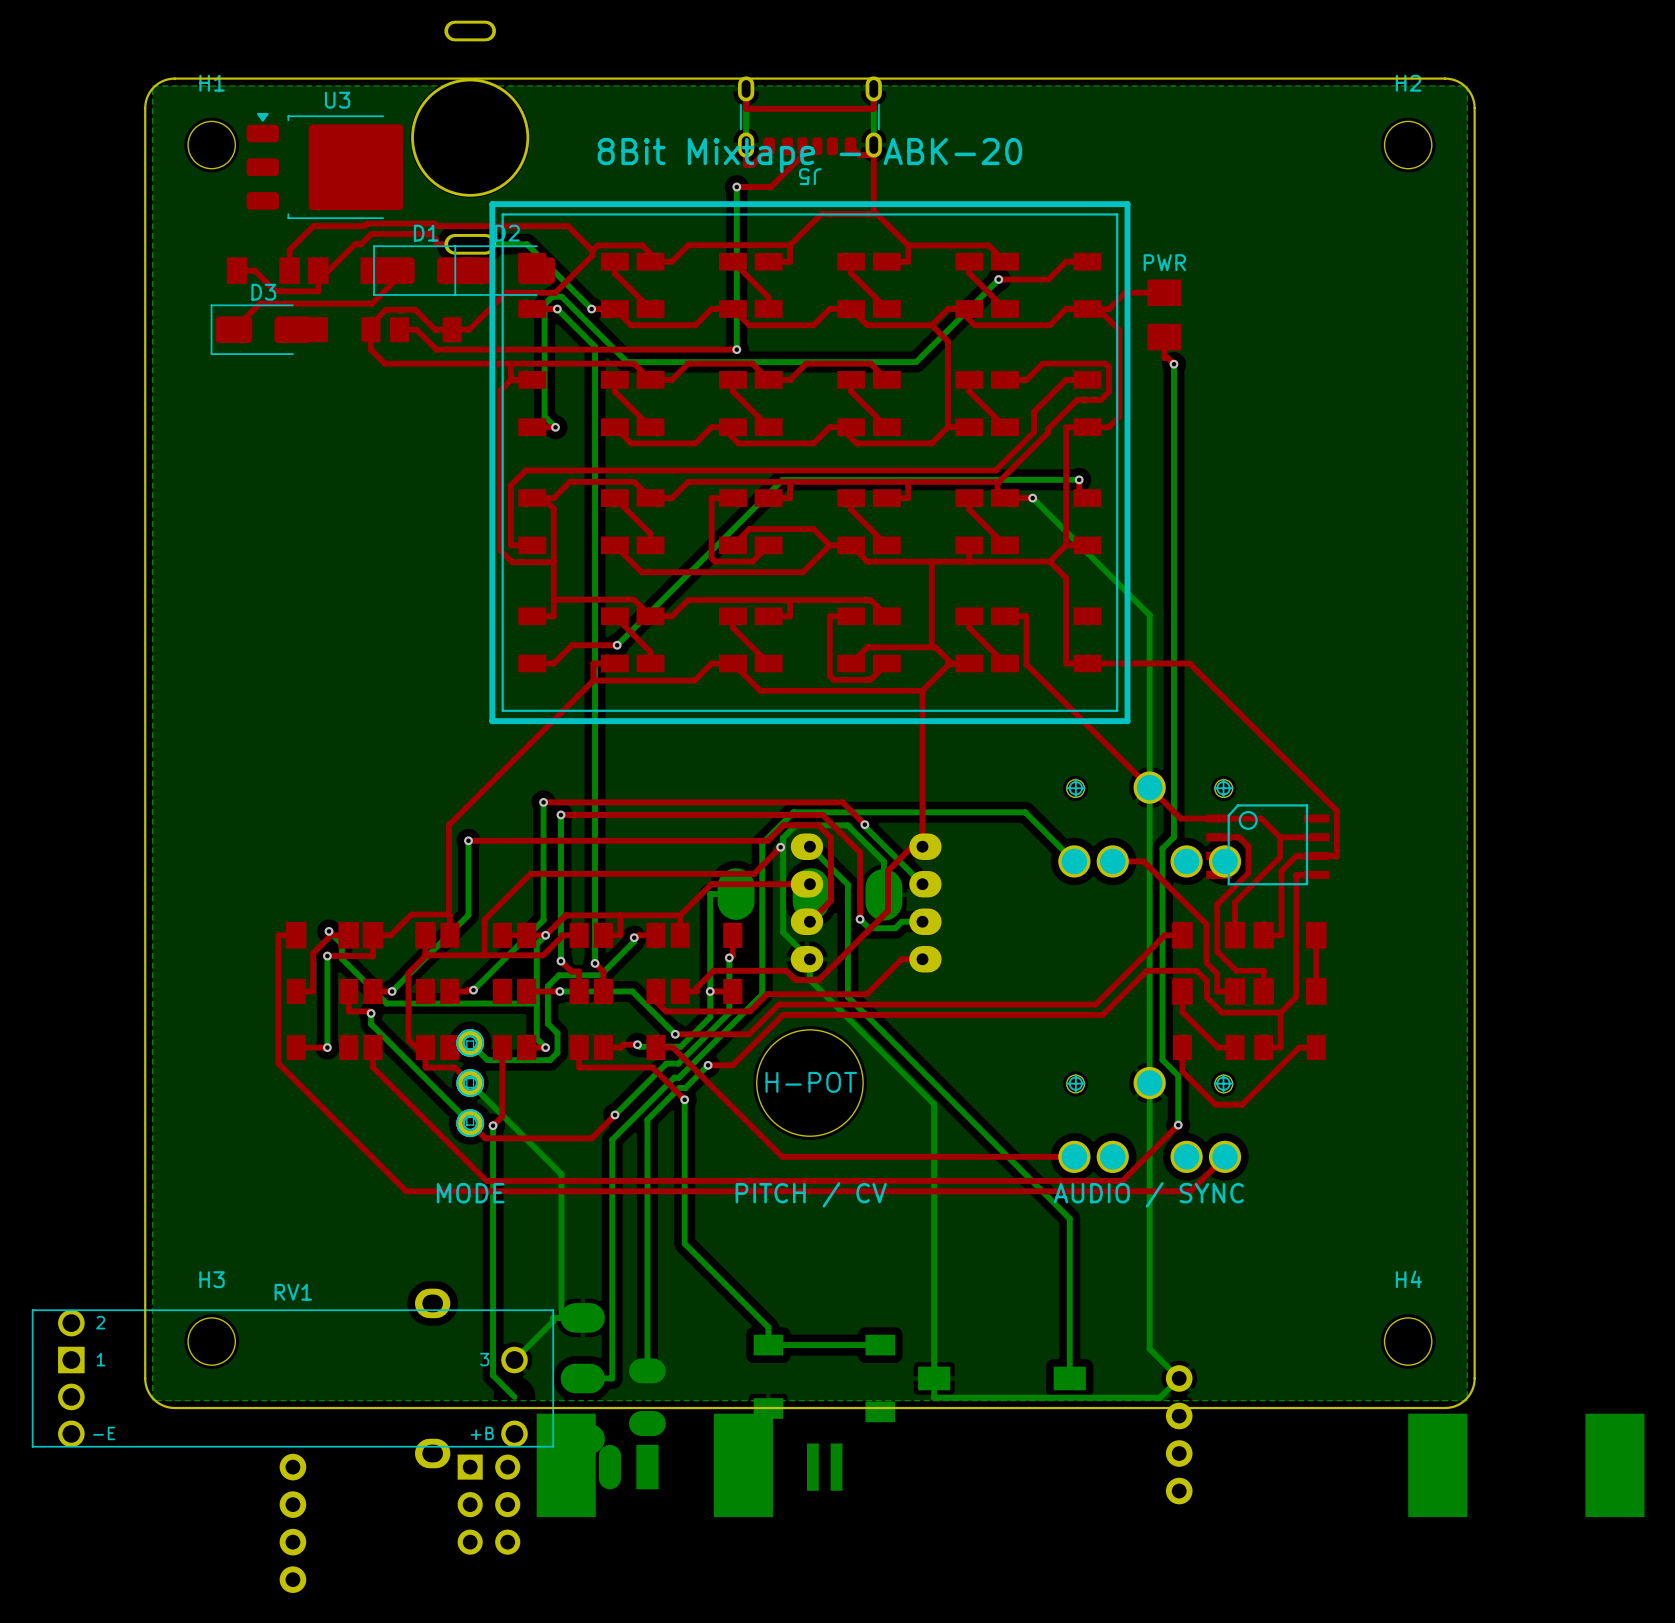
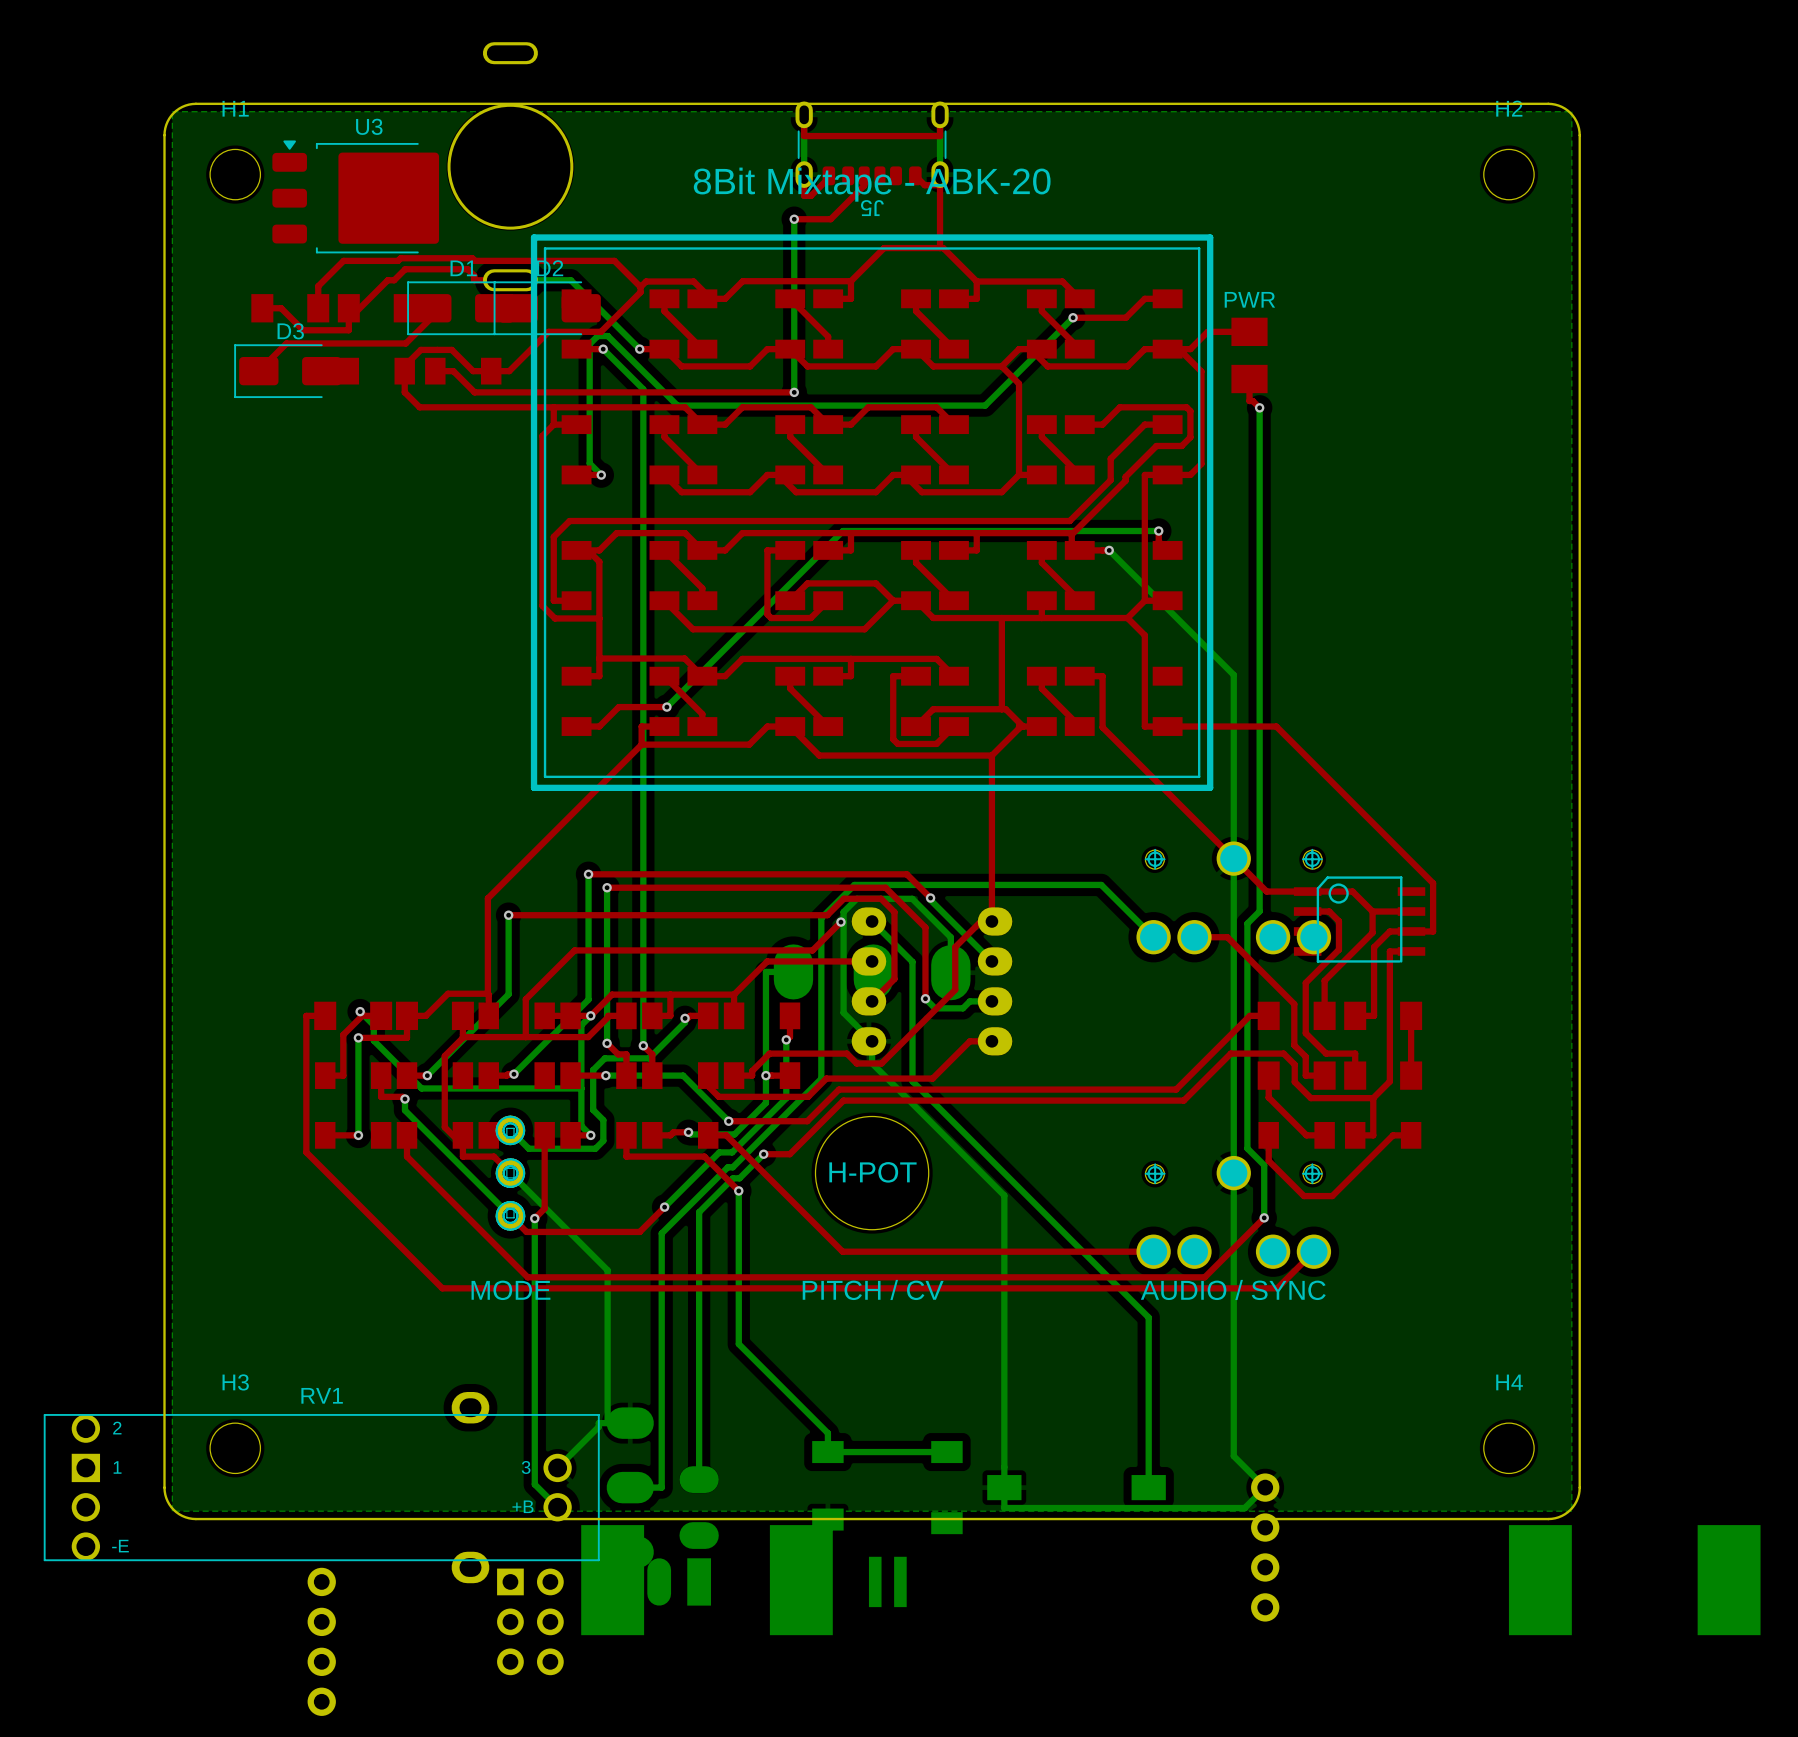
RV1 footprint: [31, 1309, 555, 1448] -> [43, 1414, 600, 1562]

